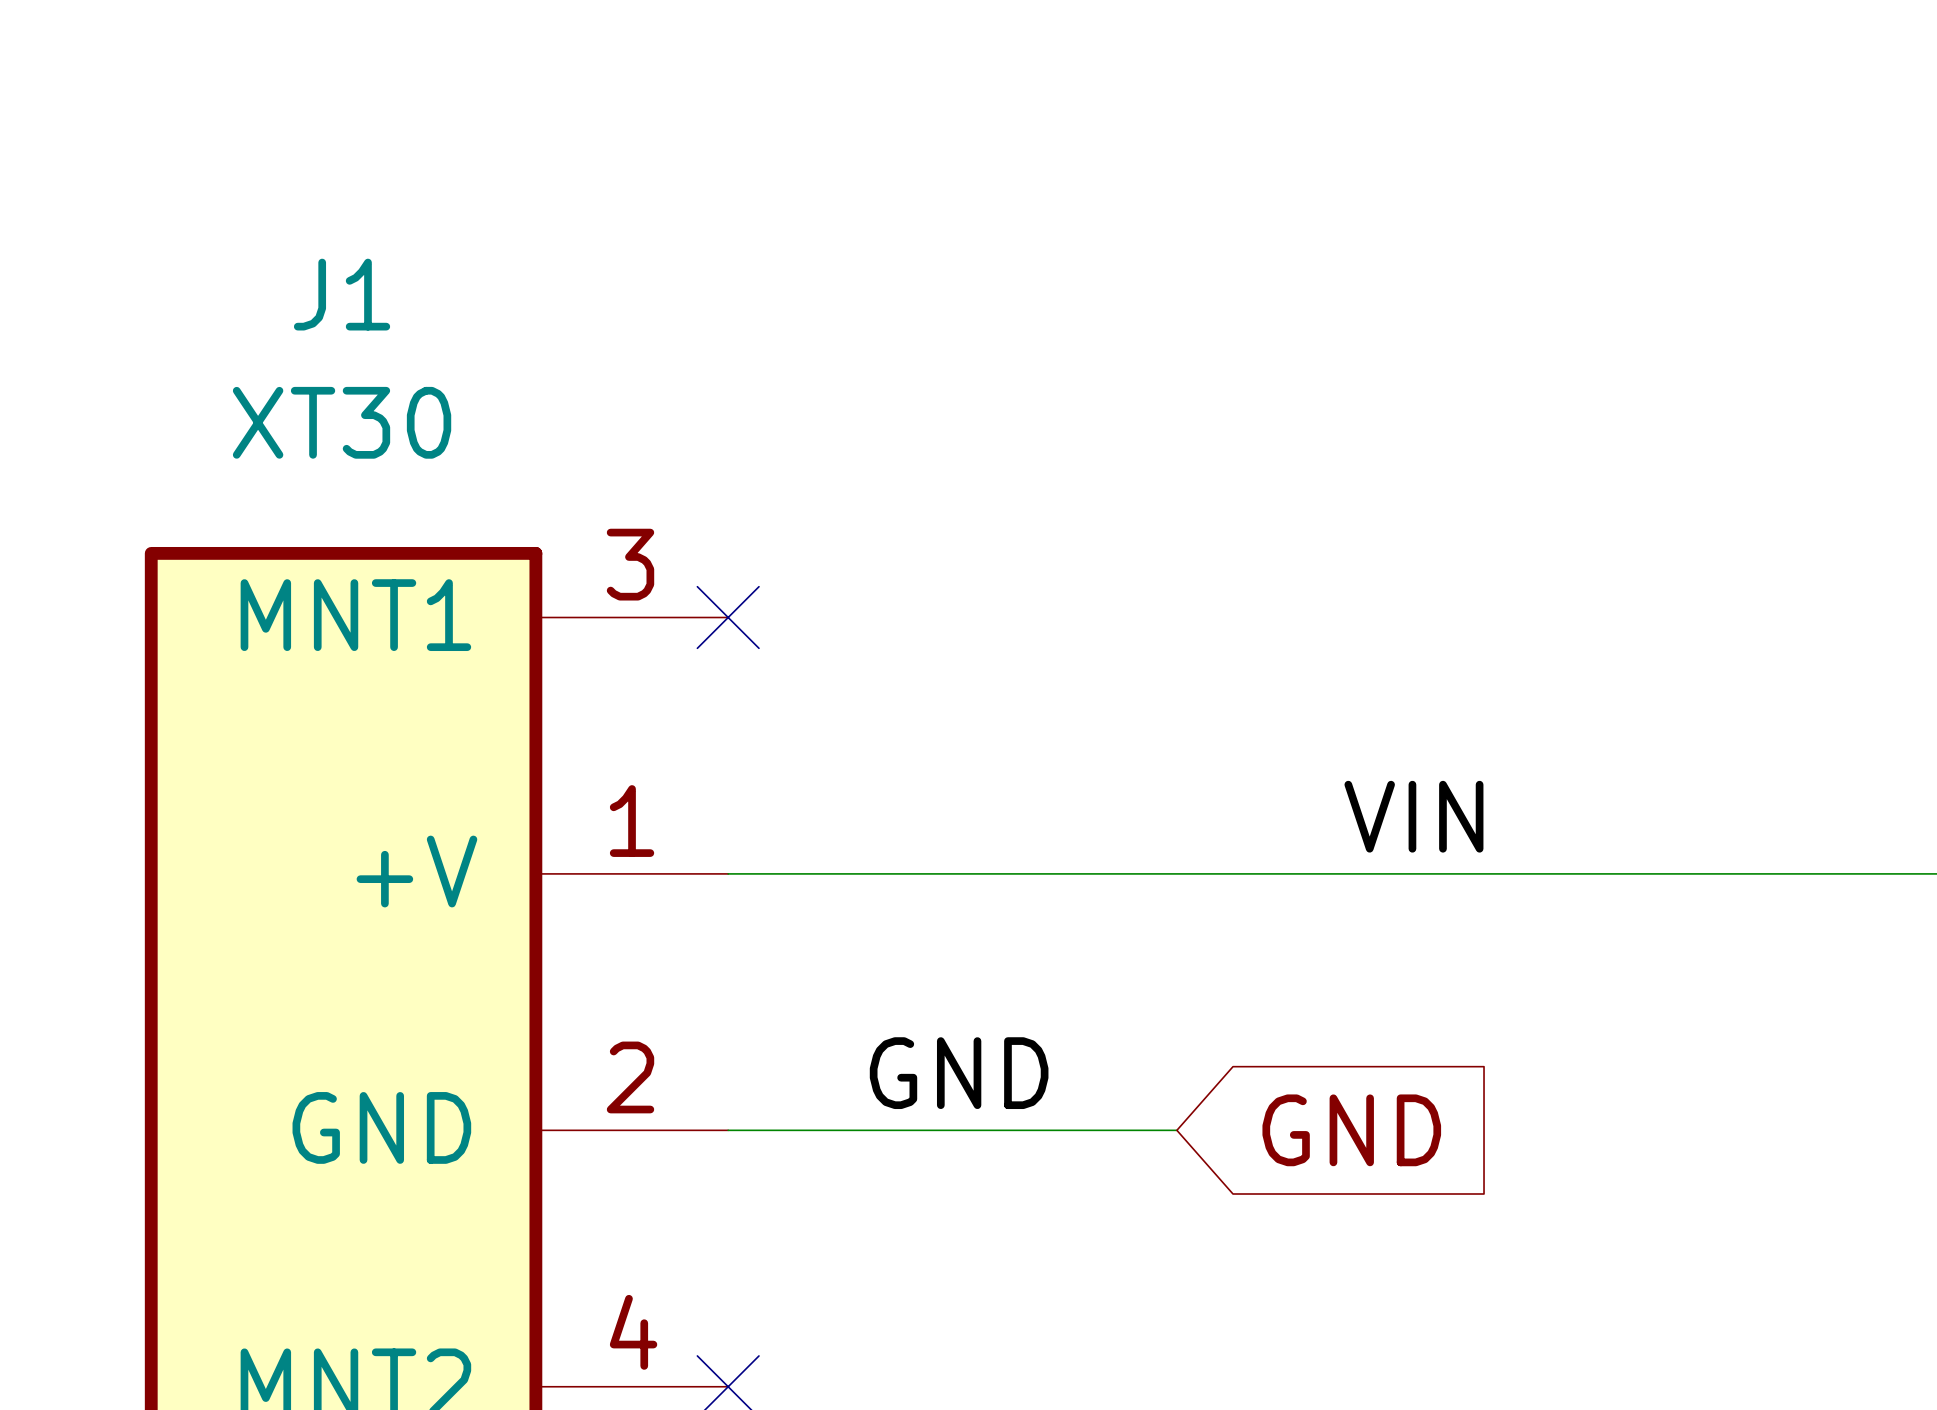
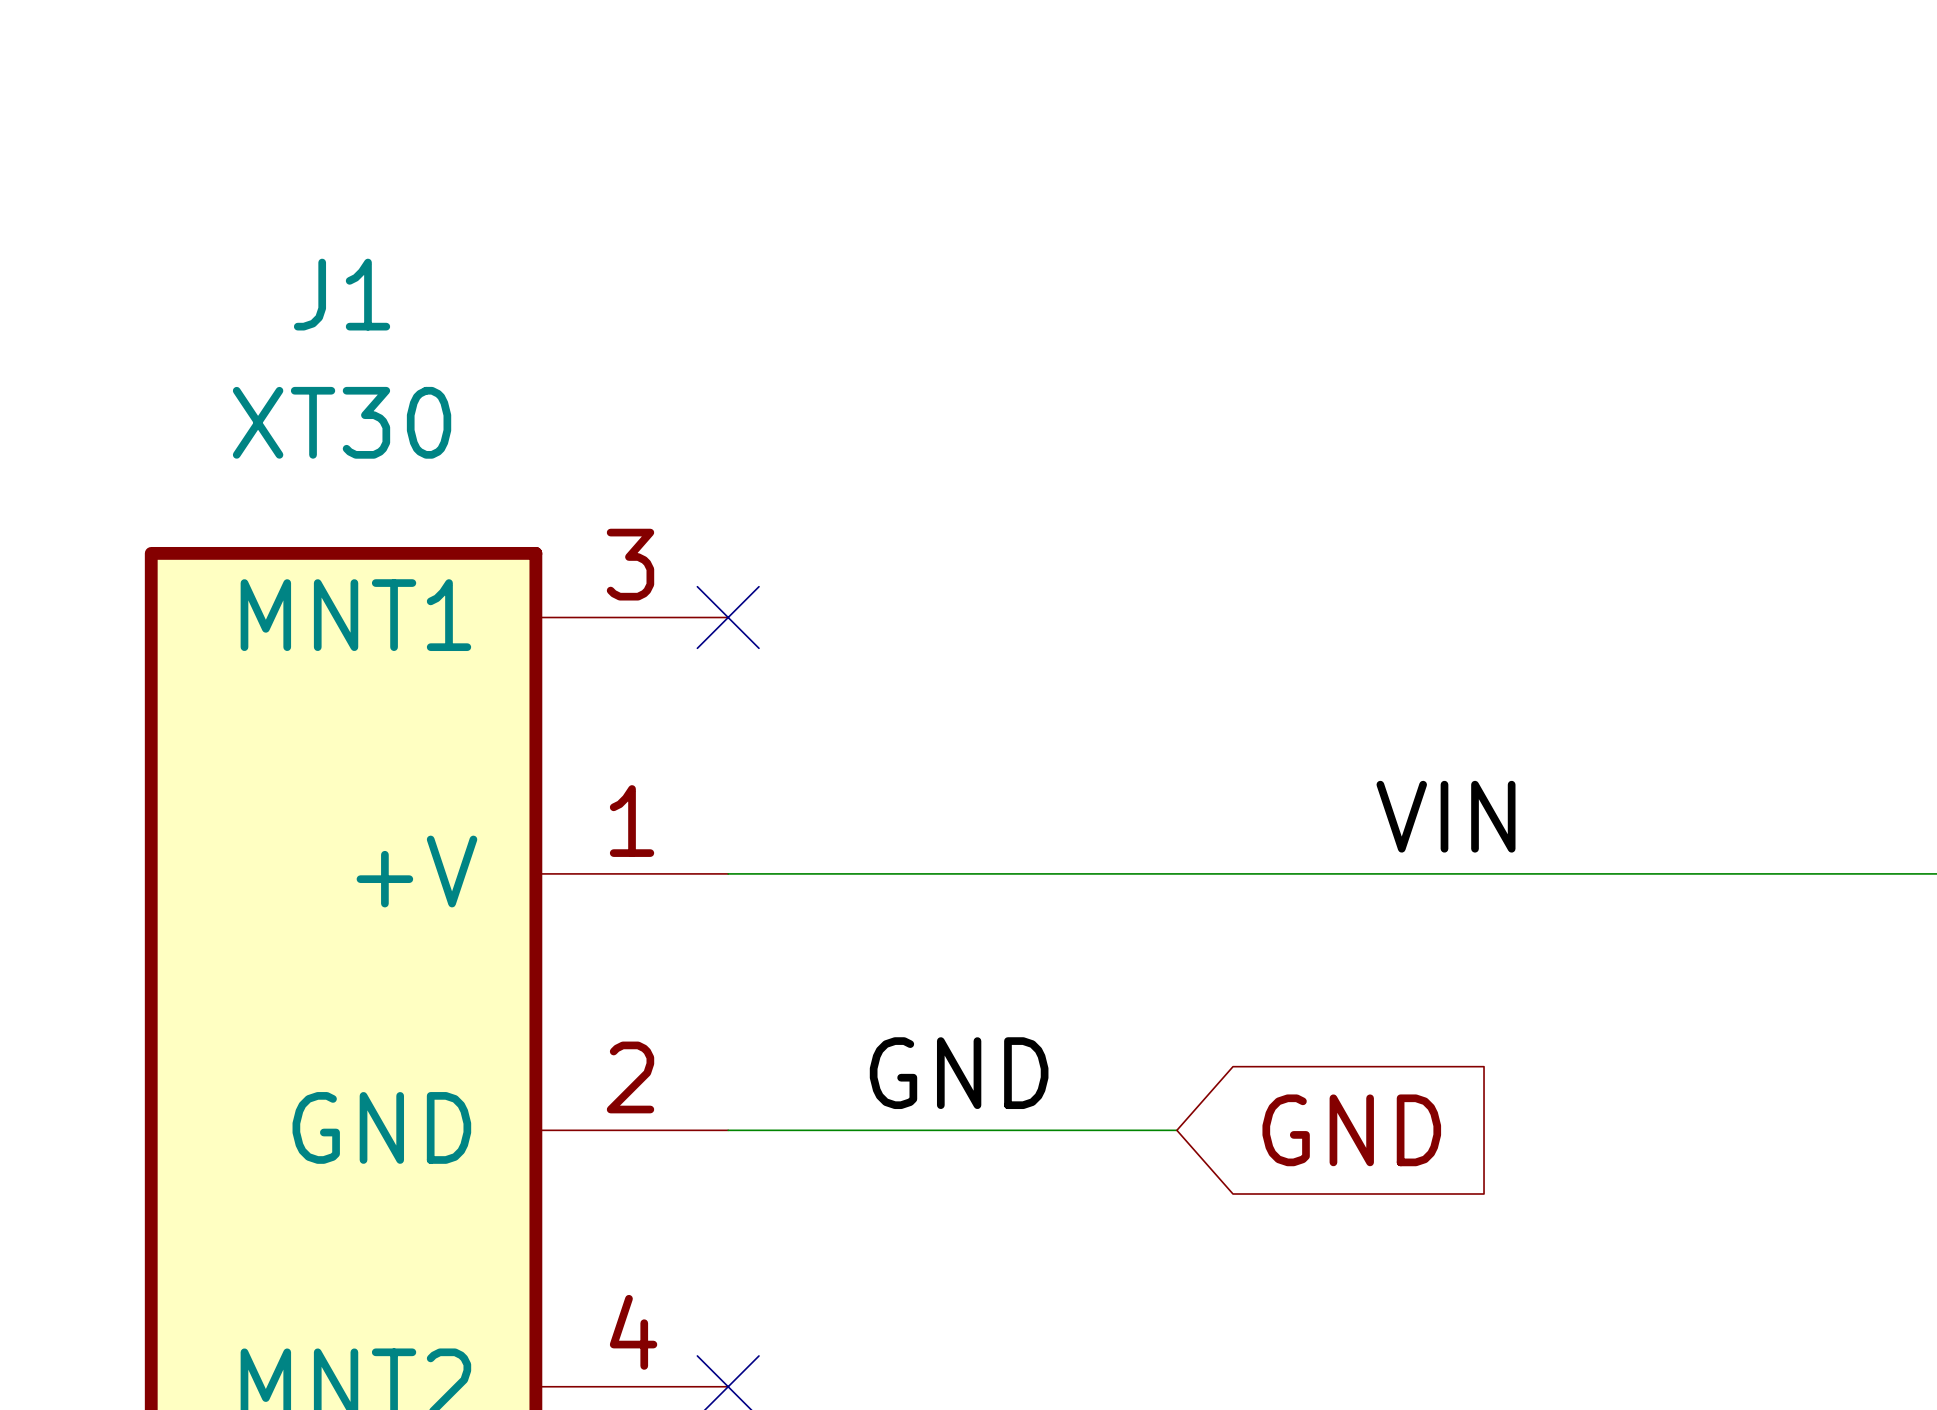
label position: VIN (1413, 816) -> VIN (1446, 816)

